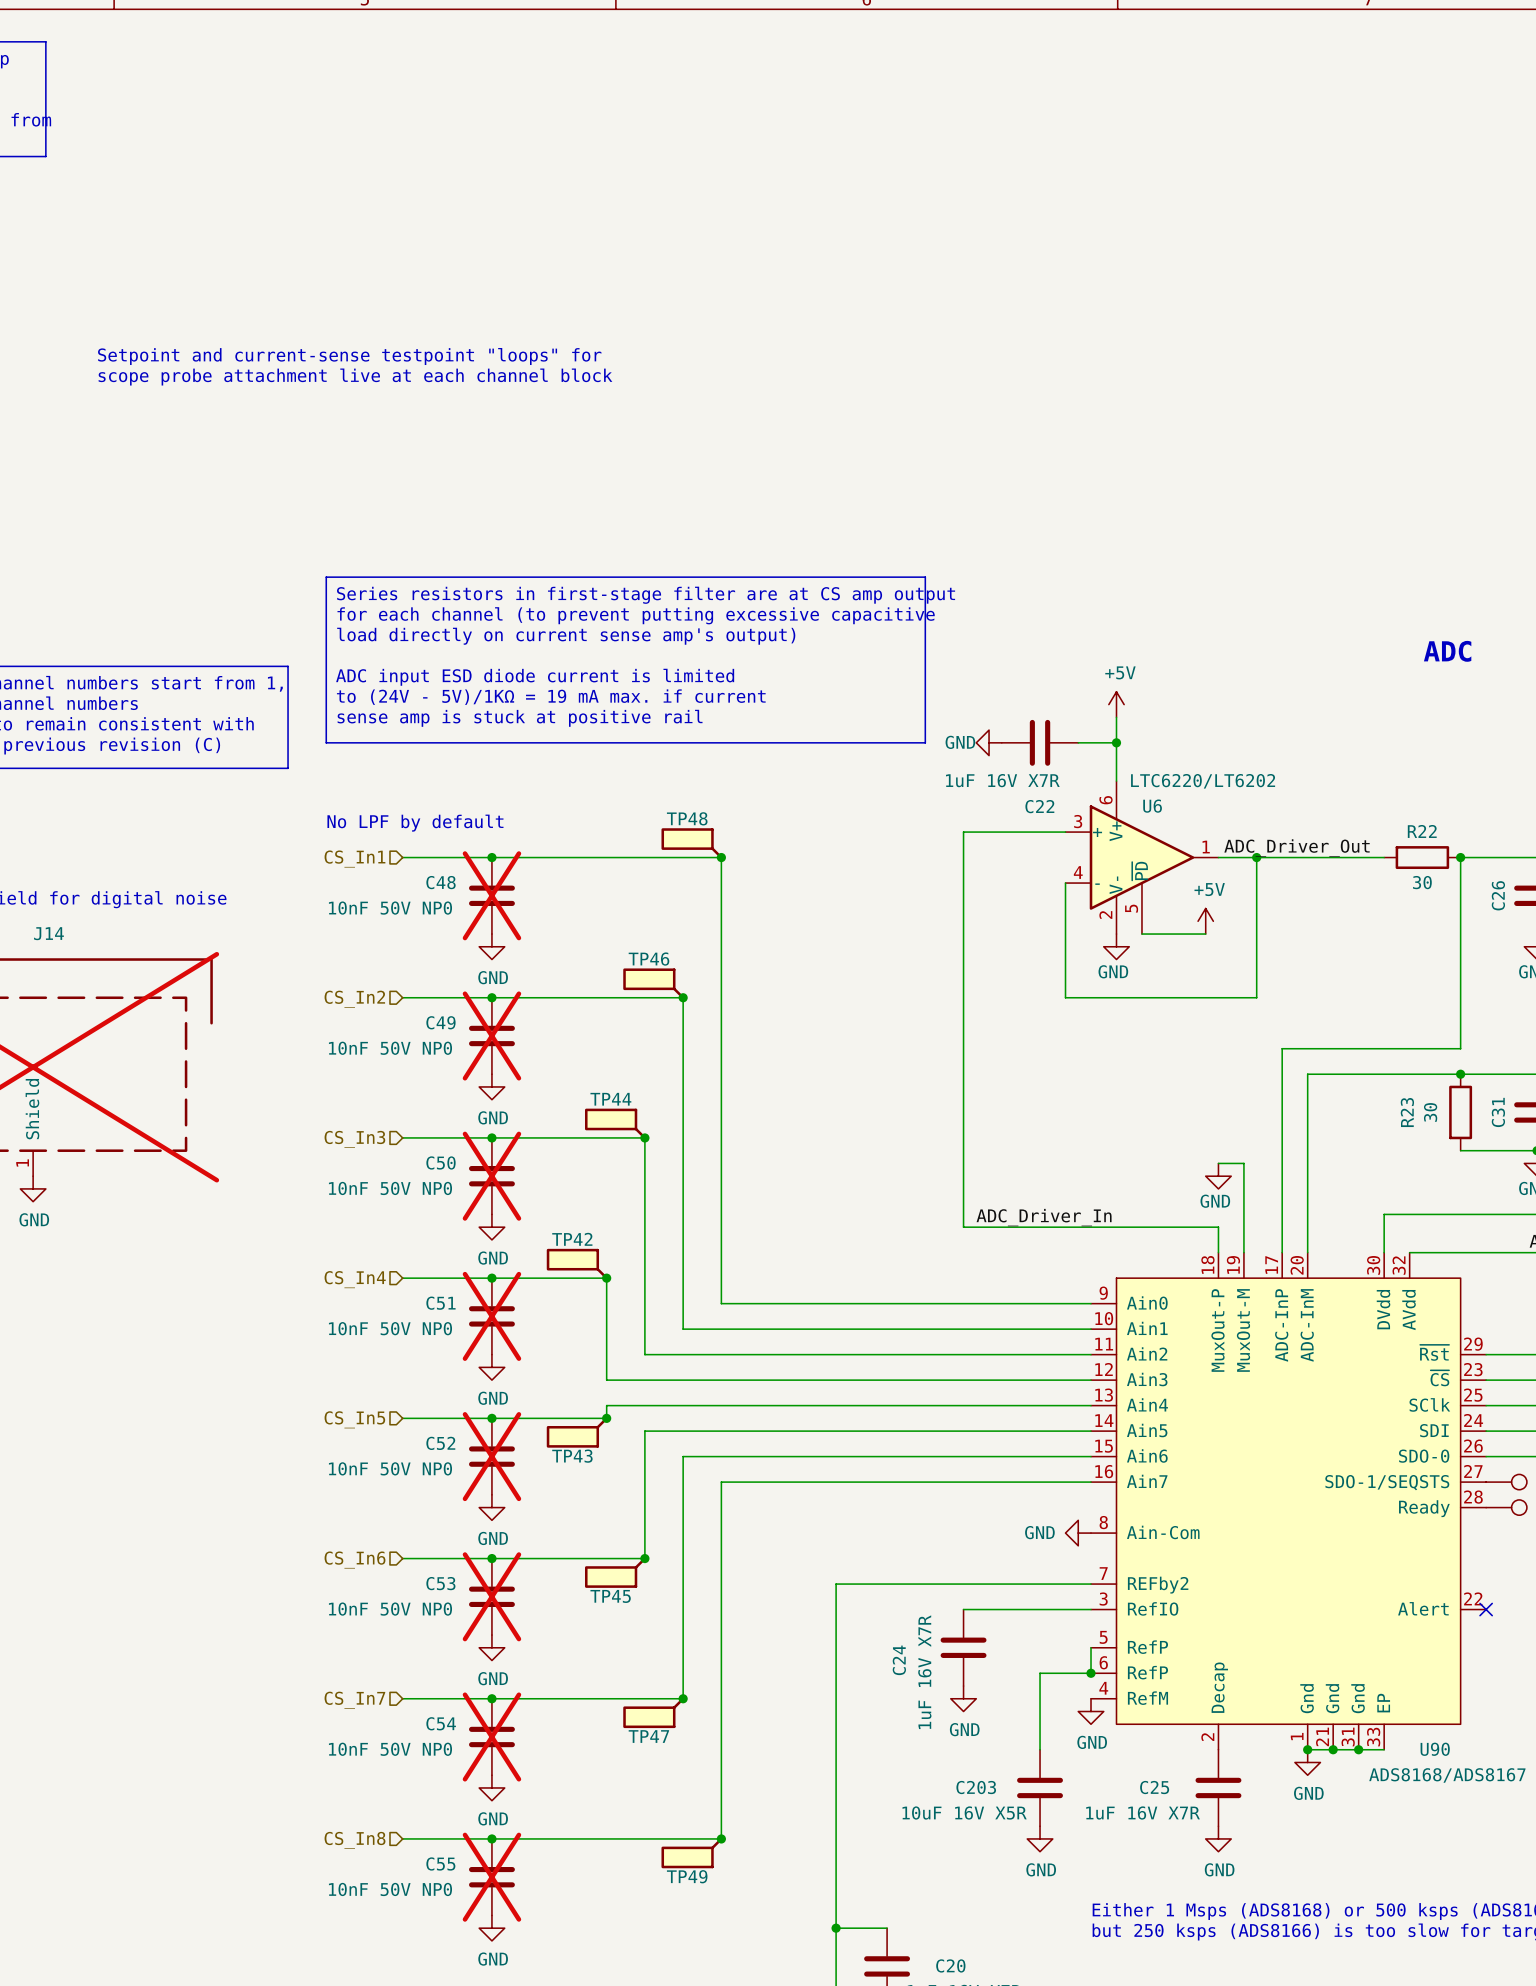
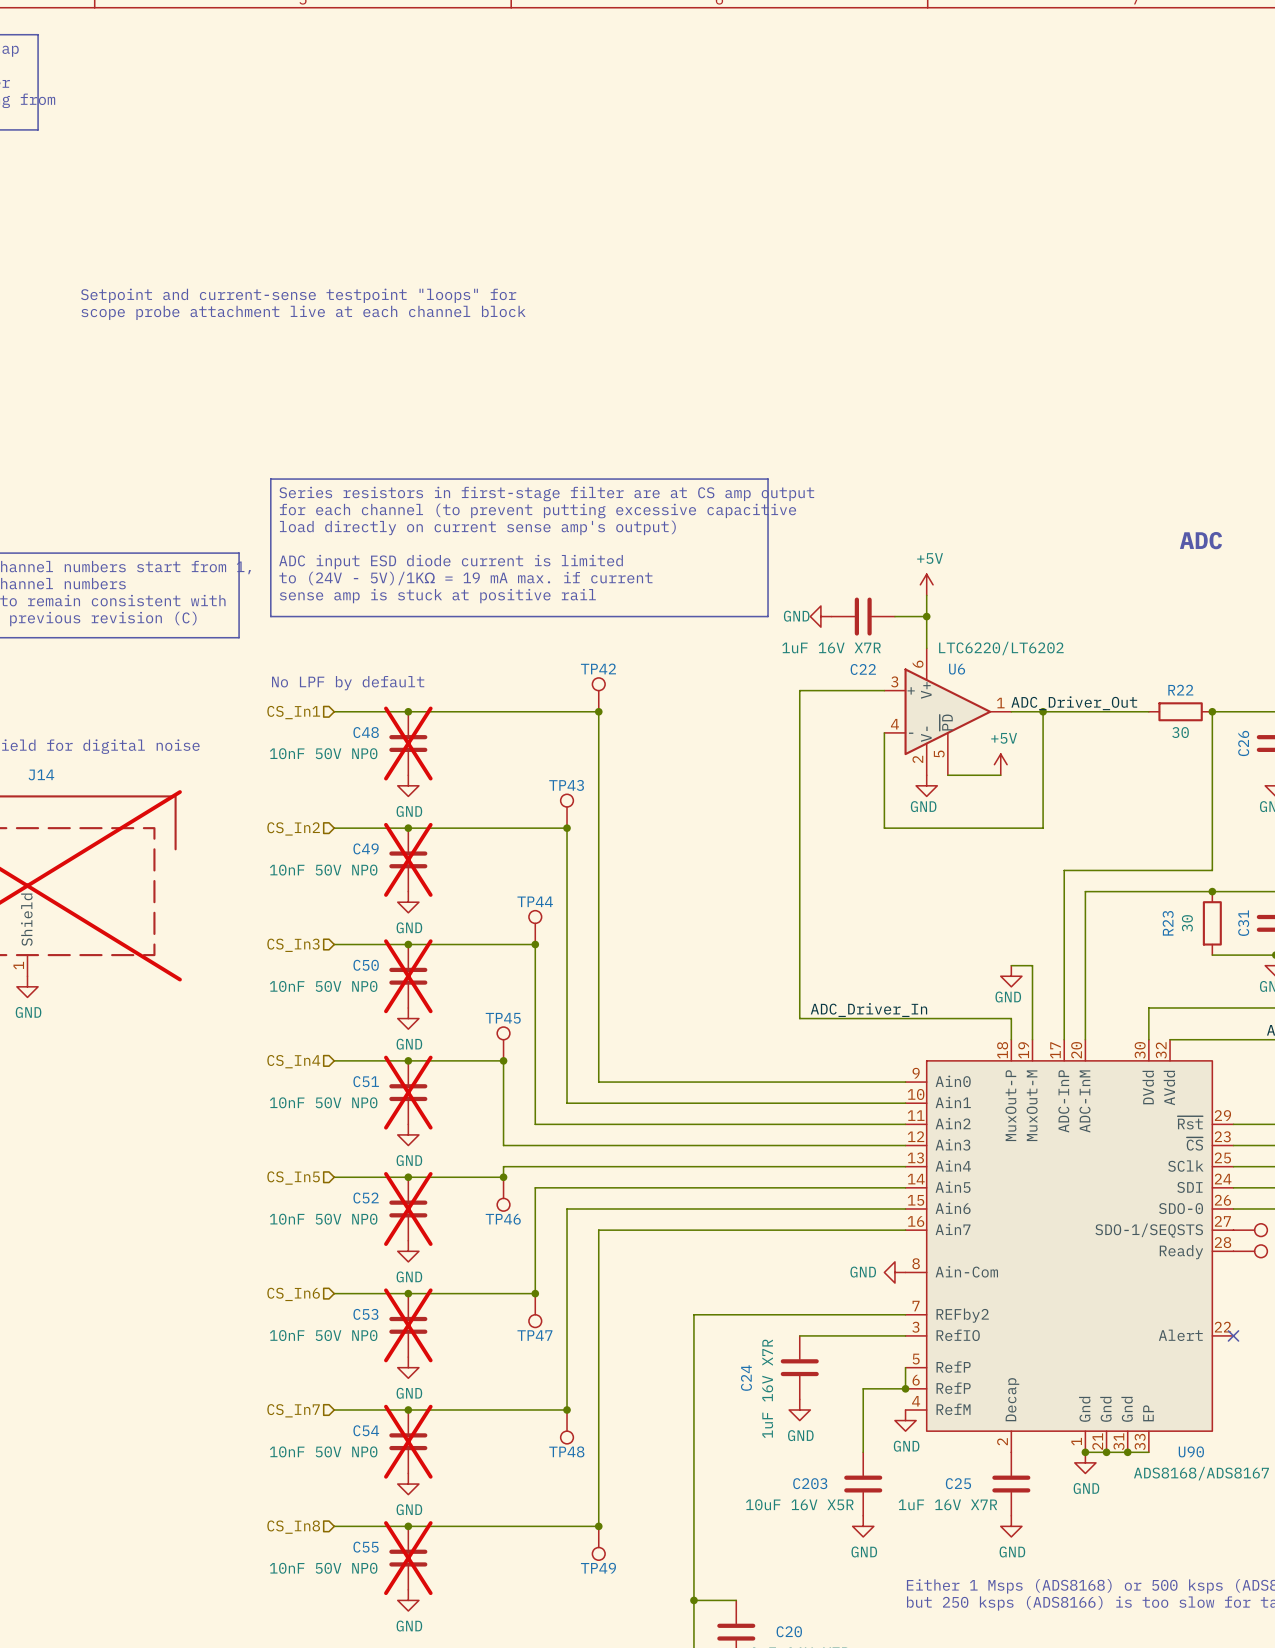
TP48 name position: TP48 (687, 818) -> TP48 (566, 1451)
TP48 symbol: [661, 828, 723, 859] -> [560, 1409, 574, 1444]
TP46 name position: TP46 (648, 959) -> TP46 (503, 1219)
TP46 symbol: [623, 968, 685, 1000] -> [497, 1177, 510, 1212]
TP44 symbol: [585, 1108, 647, 1140] -> [528, 910, 542, 945]
TP42 symbol: [546, 1248, 608, 1280] -> [592, 677, 606, 712]
TP43 symbol: [546, 1417, 608, 1448] -> [560, 794, 574, 829]
TP43 name position: TP43 (572, 1456) -> TP43 (566, 785)
TP45 symbol: [585, 1557, 647, 1588] -> [497, 1027, 510, 1061]
TP45 name position: TP45 (610, 1596) -> TP45 (503, 1018)
TP47 symbol: [623, 1697, 685, 1729] -> [528, 1293, 542, 1328]
TP49 symbol: [661, 1837, 723, 1869] -> [592, 1526, 606, 1561]

